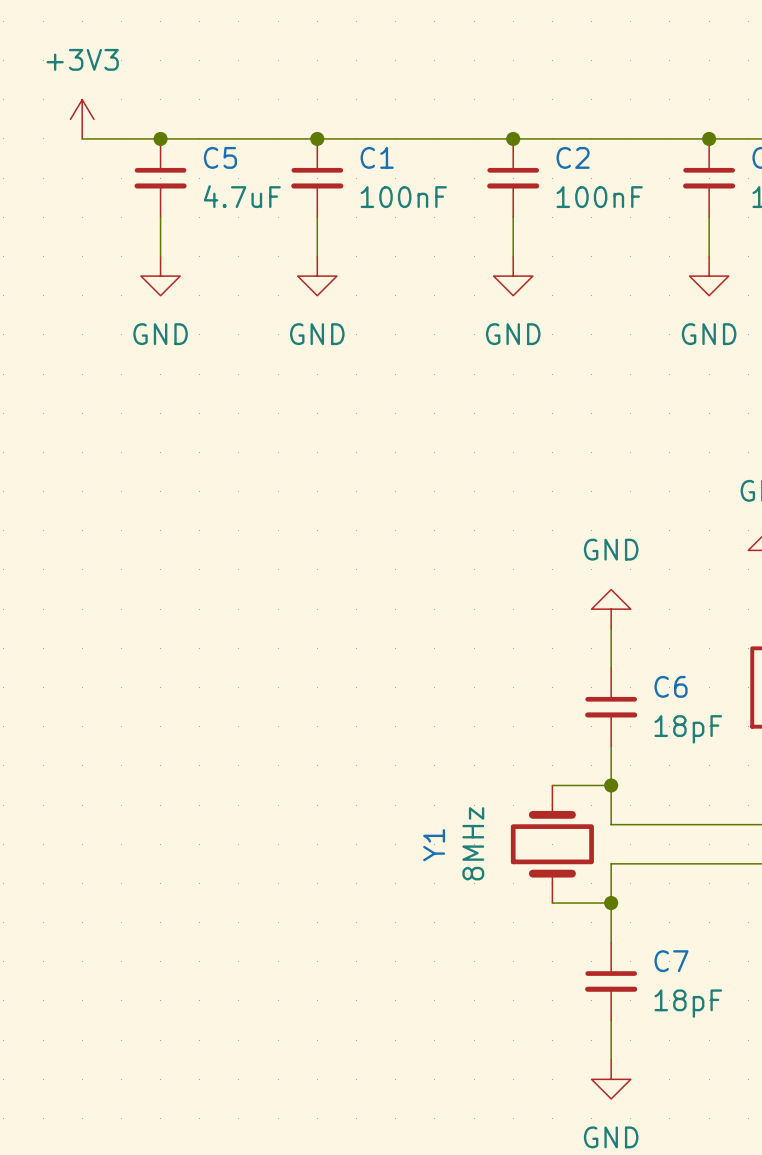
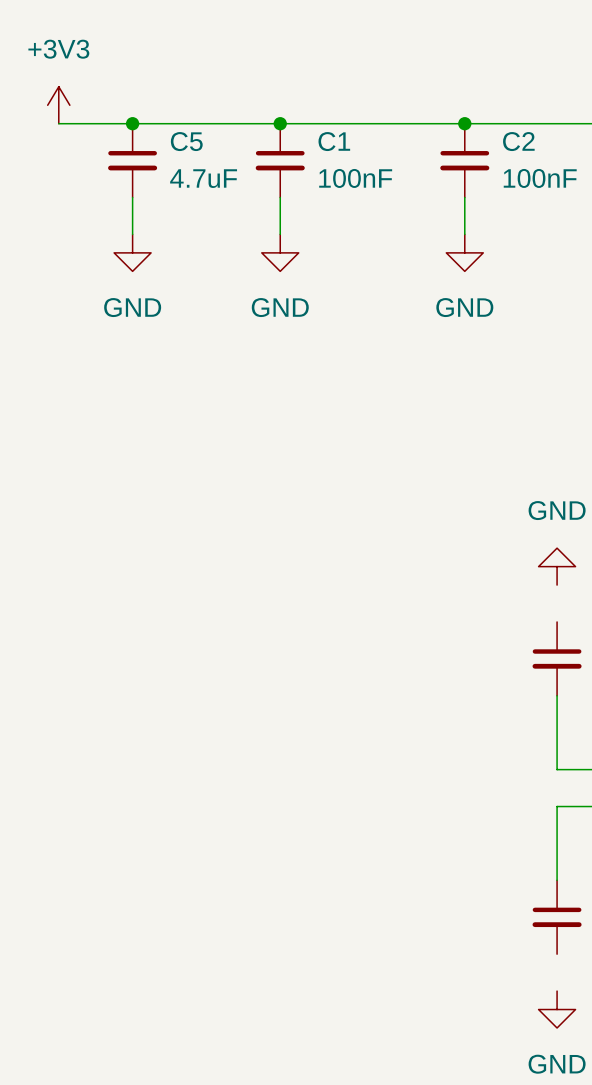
wire: (611, 628) (611, 667) -> none
wire: (552, 785) (611, 785) -> none
junction: (611, 785) -> none
Y1: 8MHz (552, 844) -> none
wire: (552, 903) (611, 903) -> none
junction: (611, 903) -> none
wire: (611, 1020) (611, 1059) -> none

